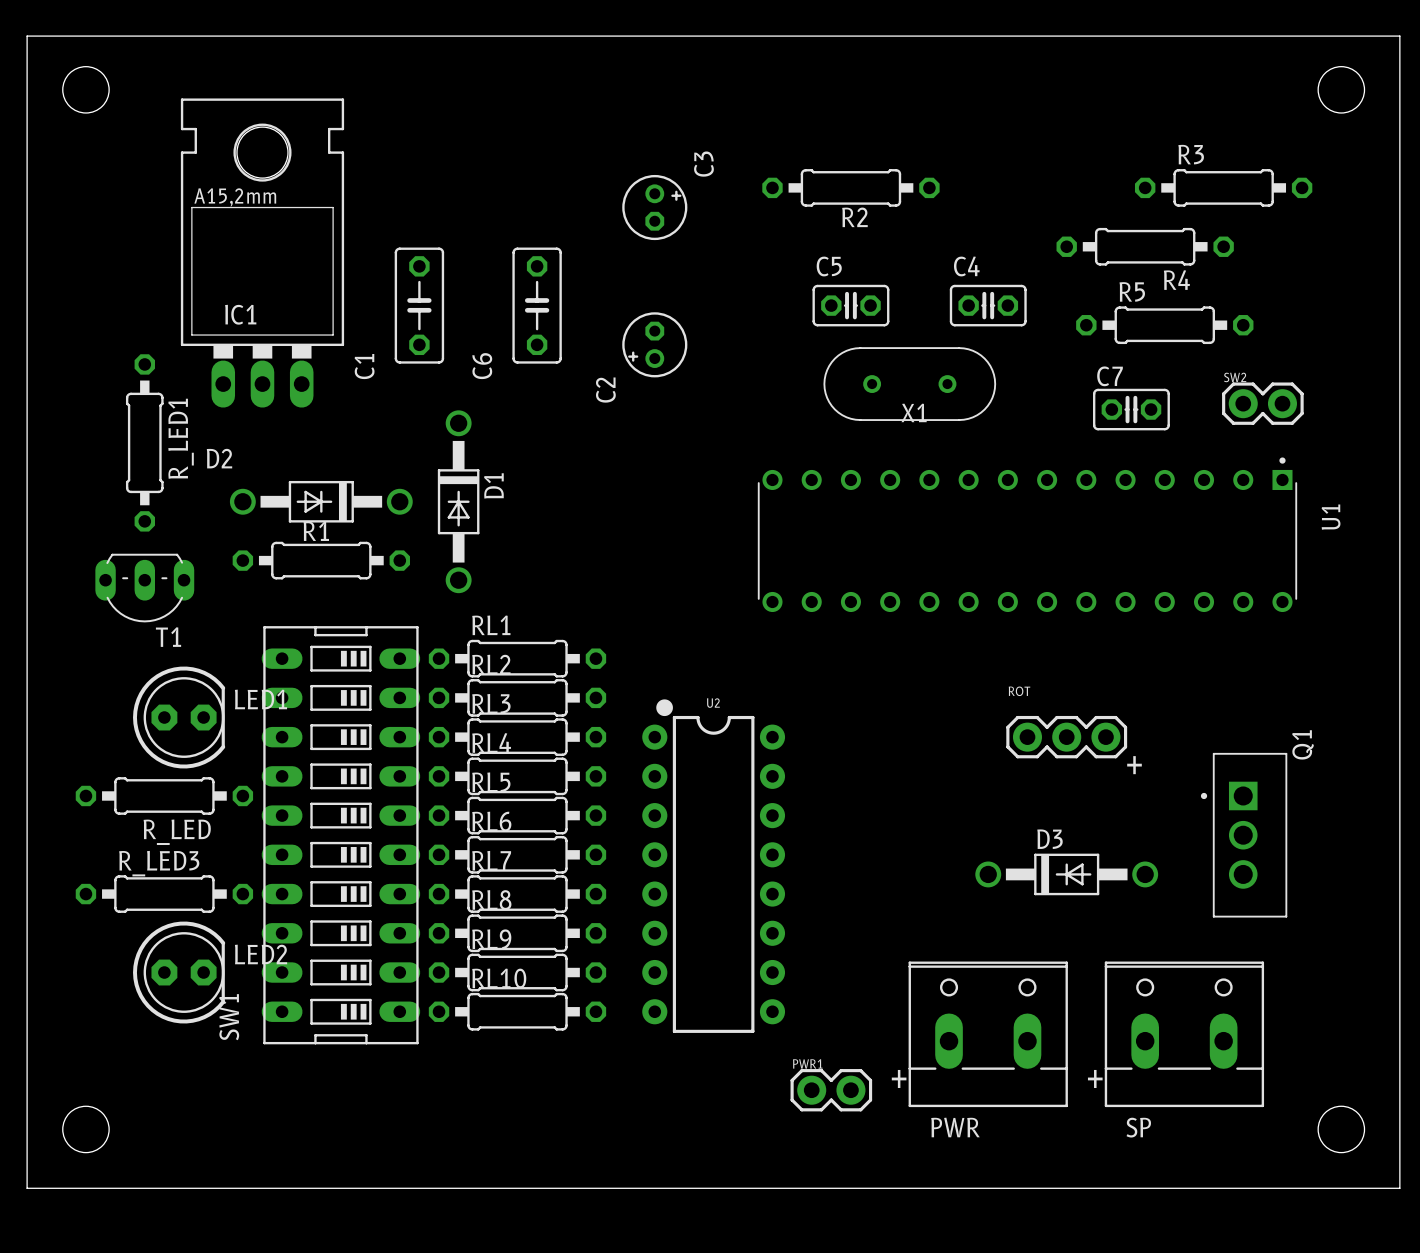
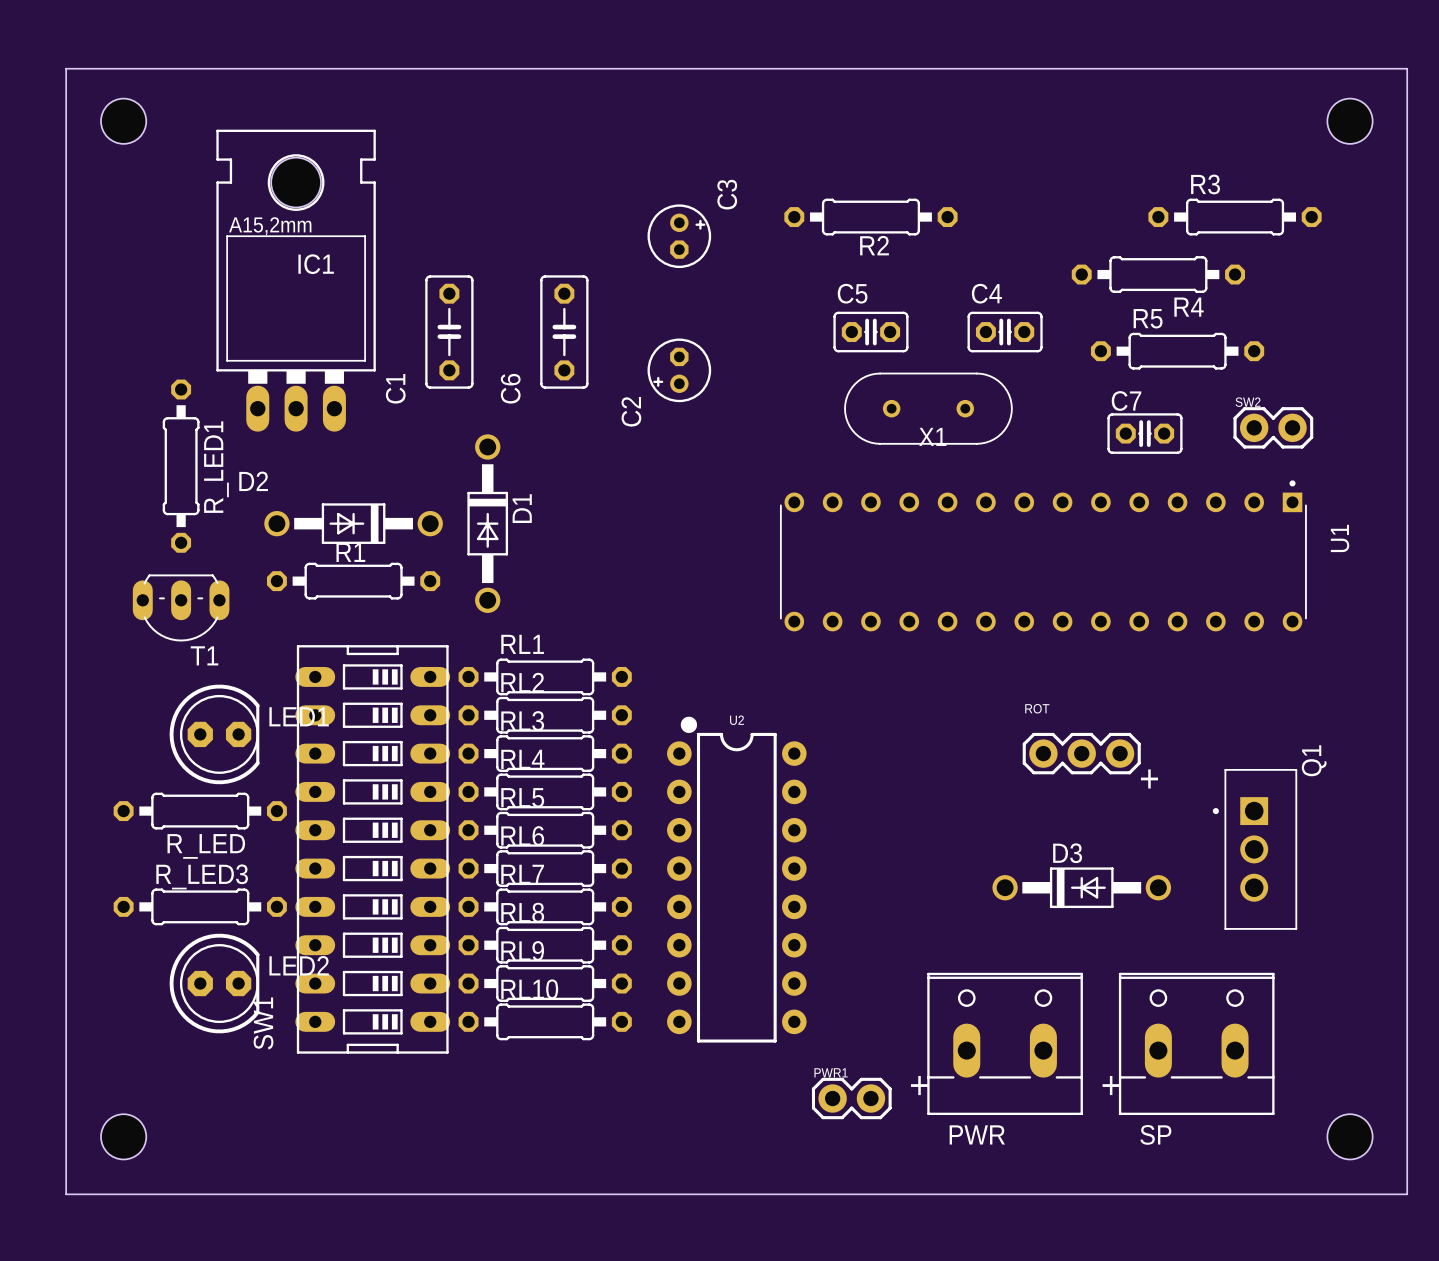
IC1 name position: IC1 (240, 314) -> IC1 (316, 264)

